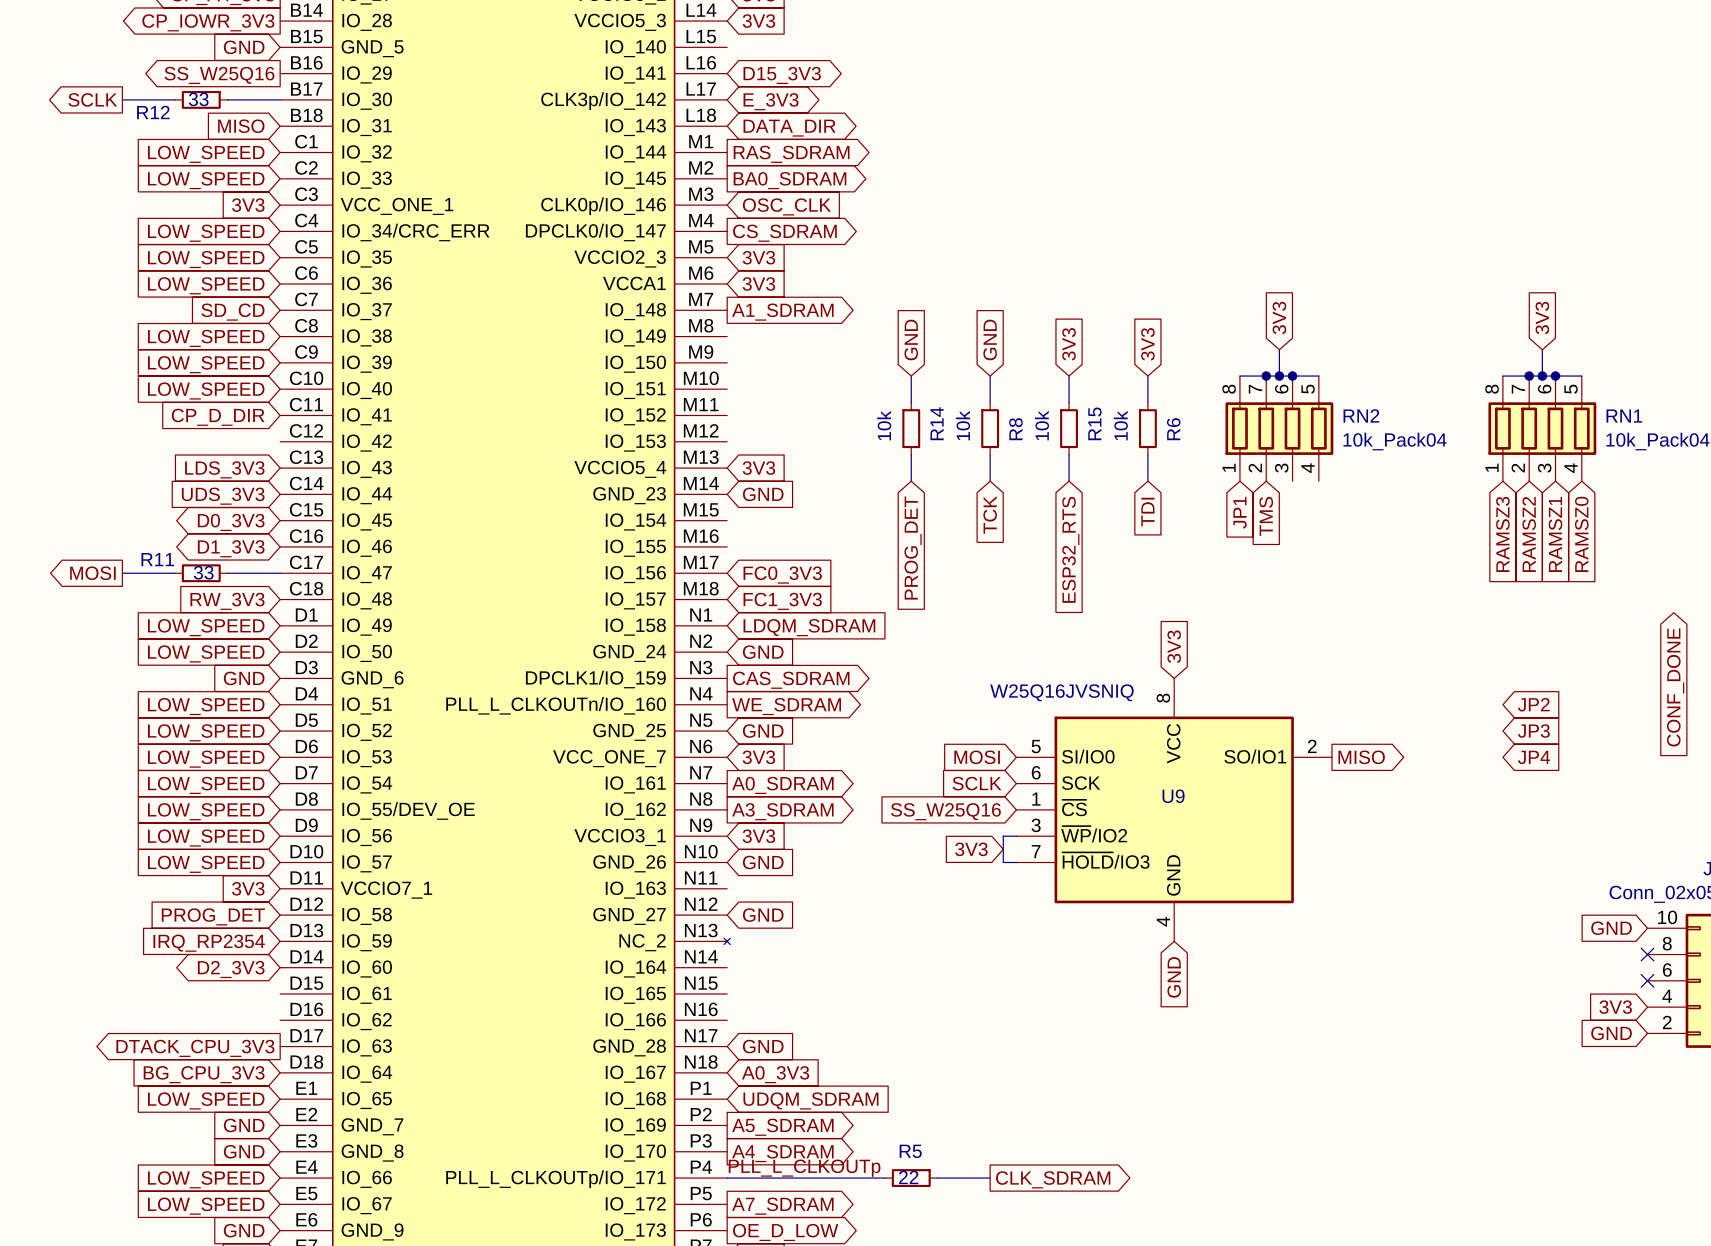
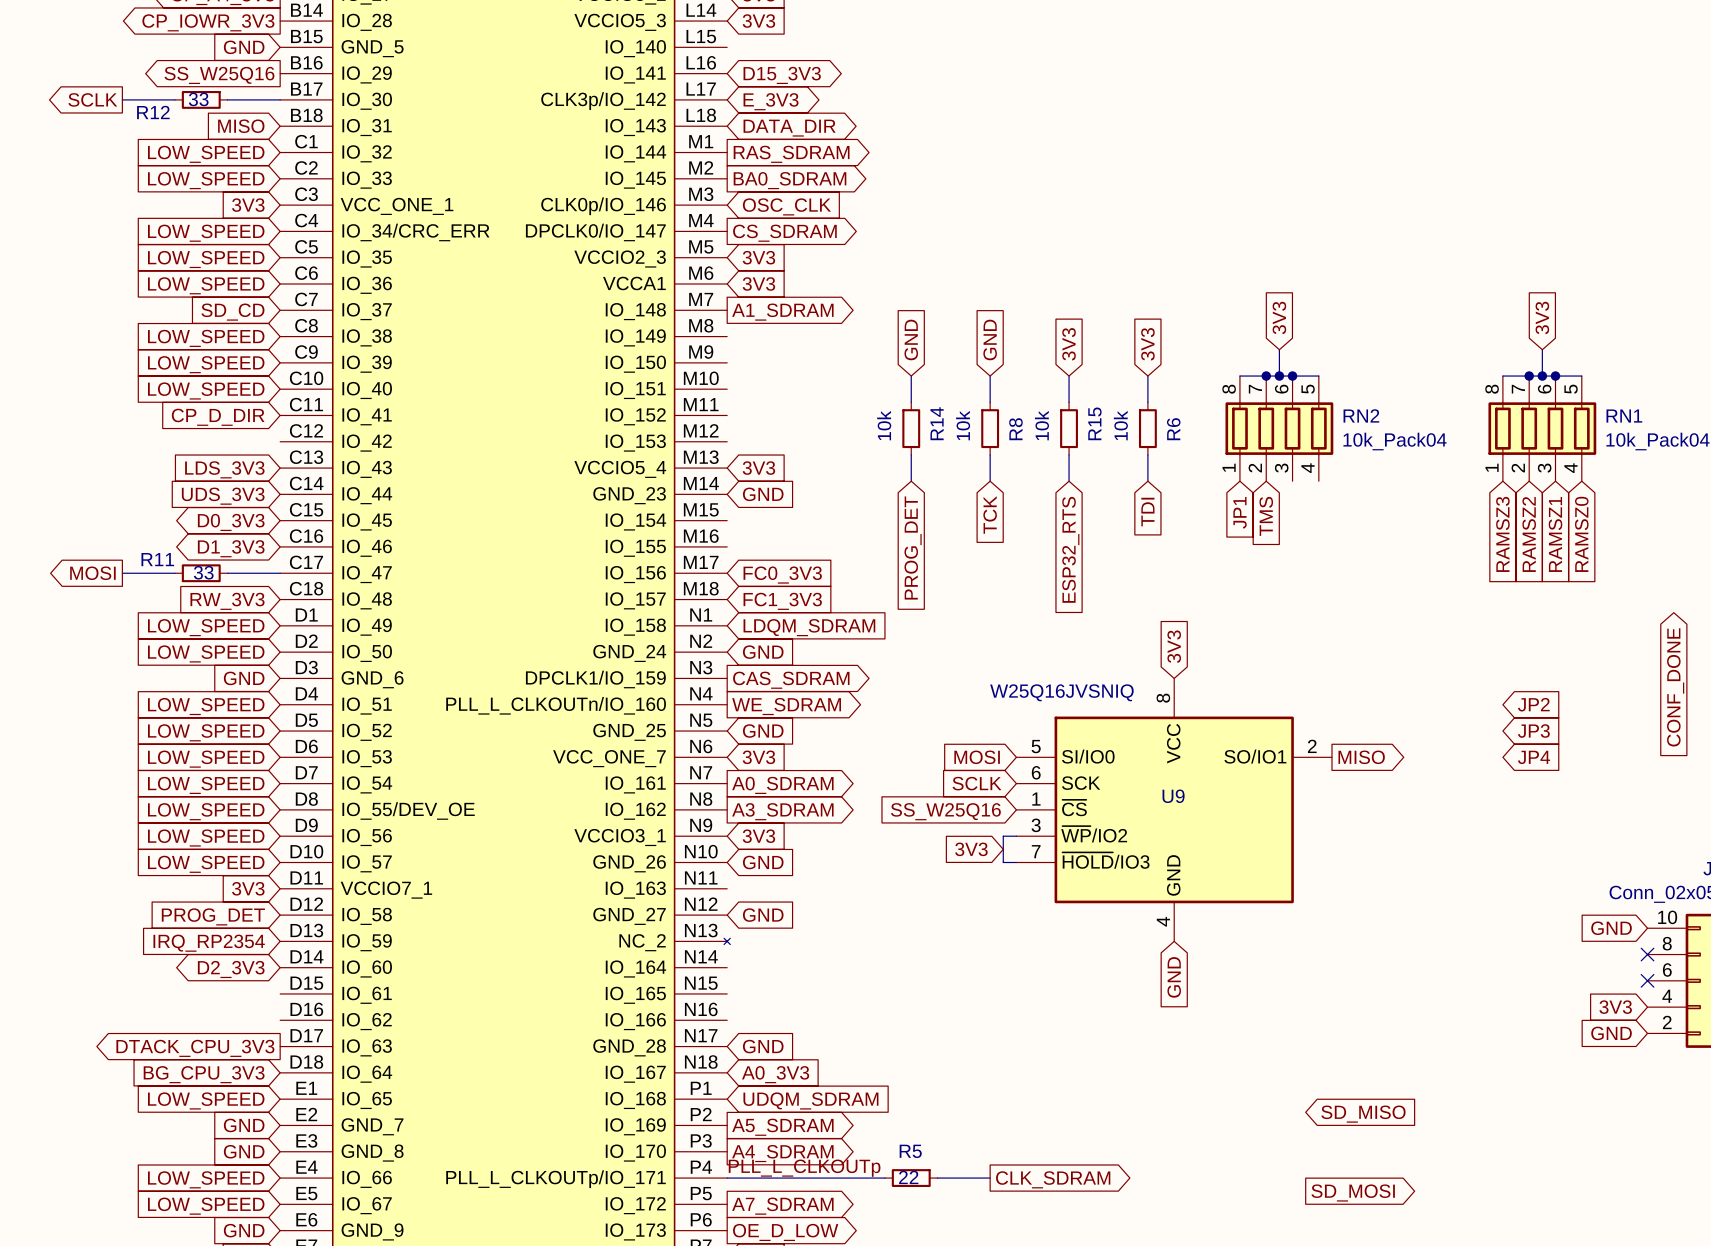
global label: none -> SD_MISO (1363, 1114)
global label: none -> SD_MOSI (1353, 1193)

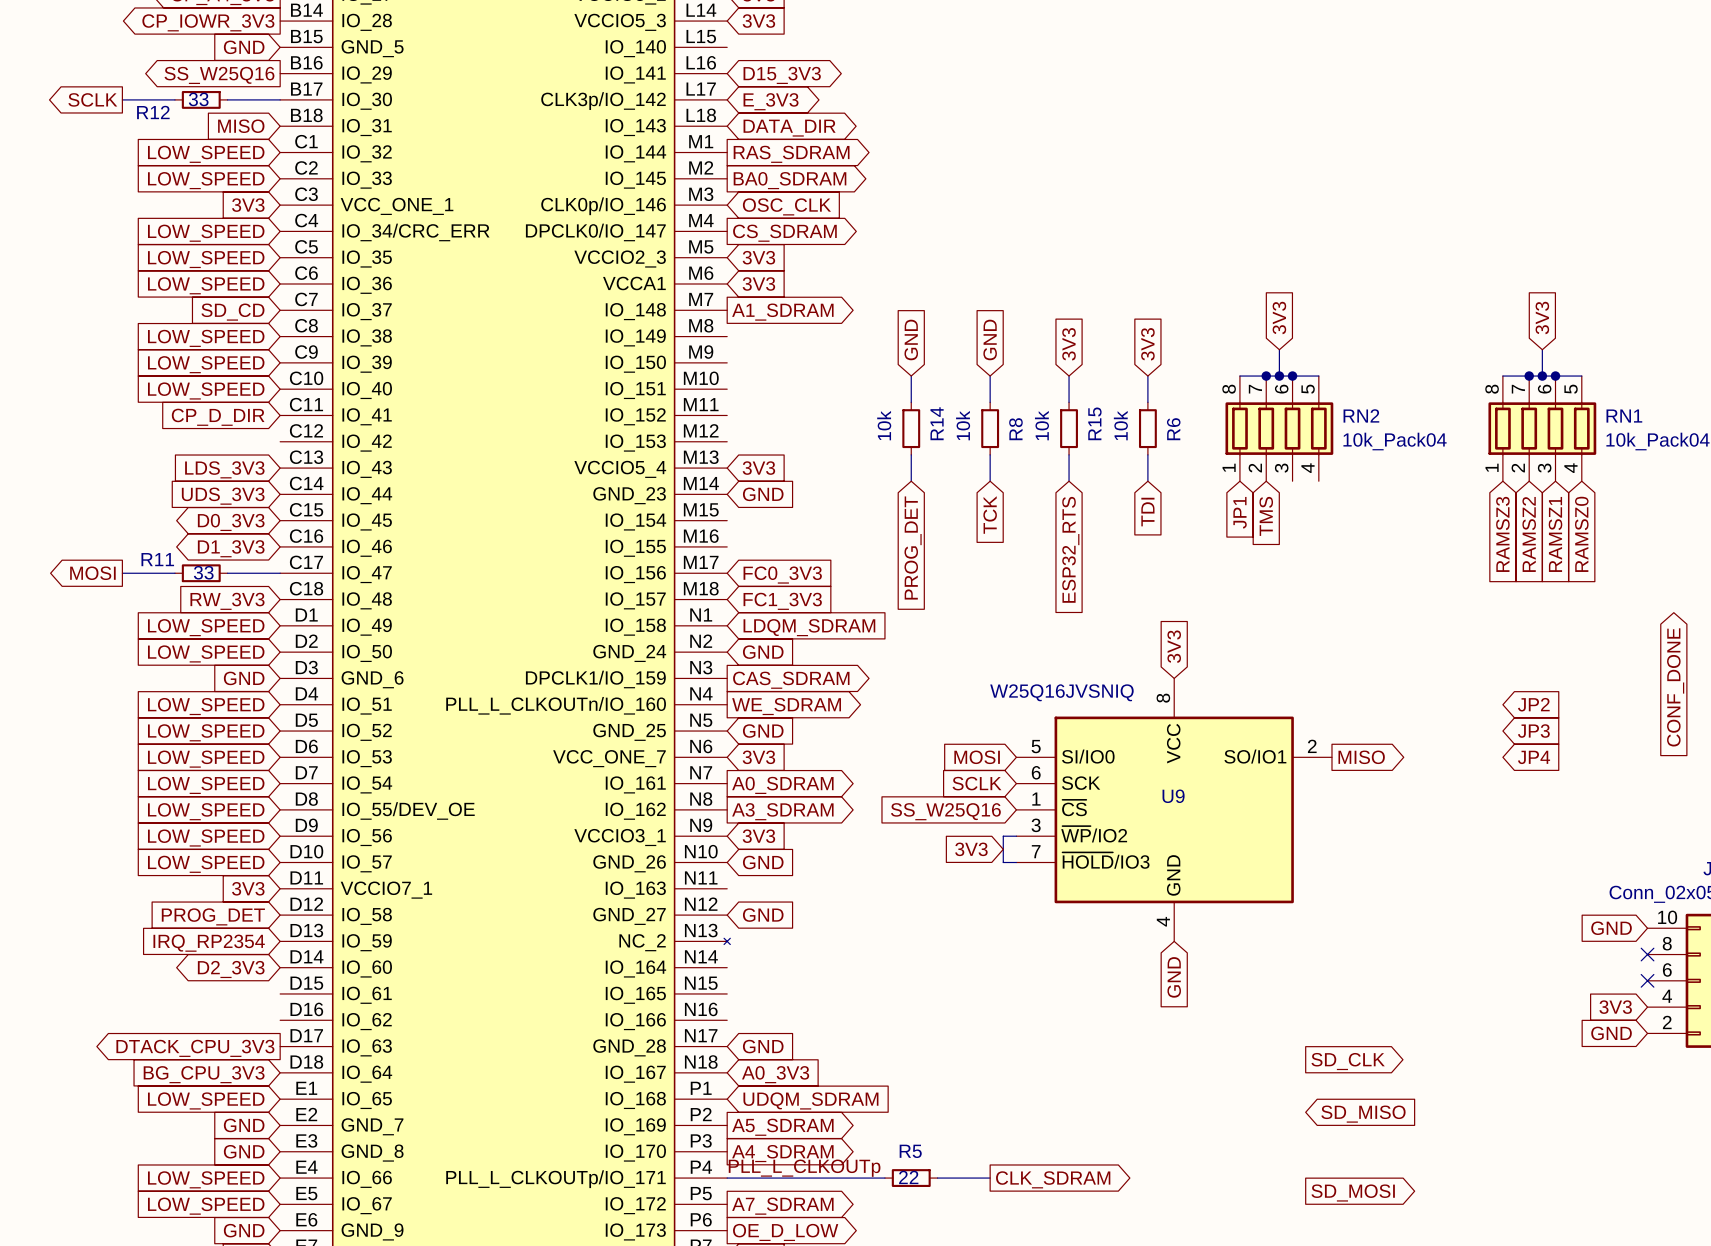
global label: none -> SD_CLK (1348, 1061)

